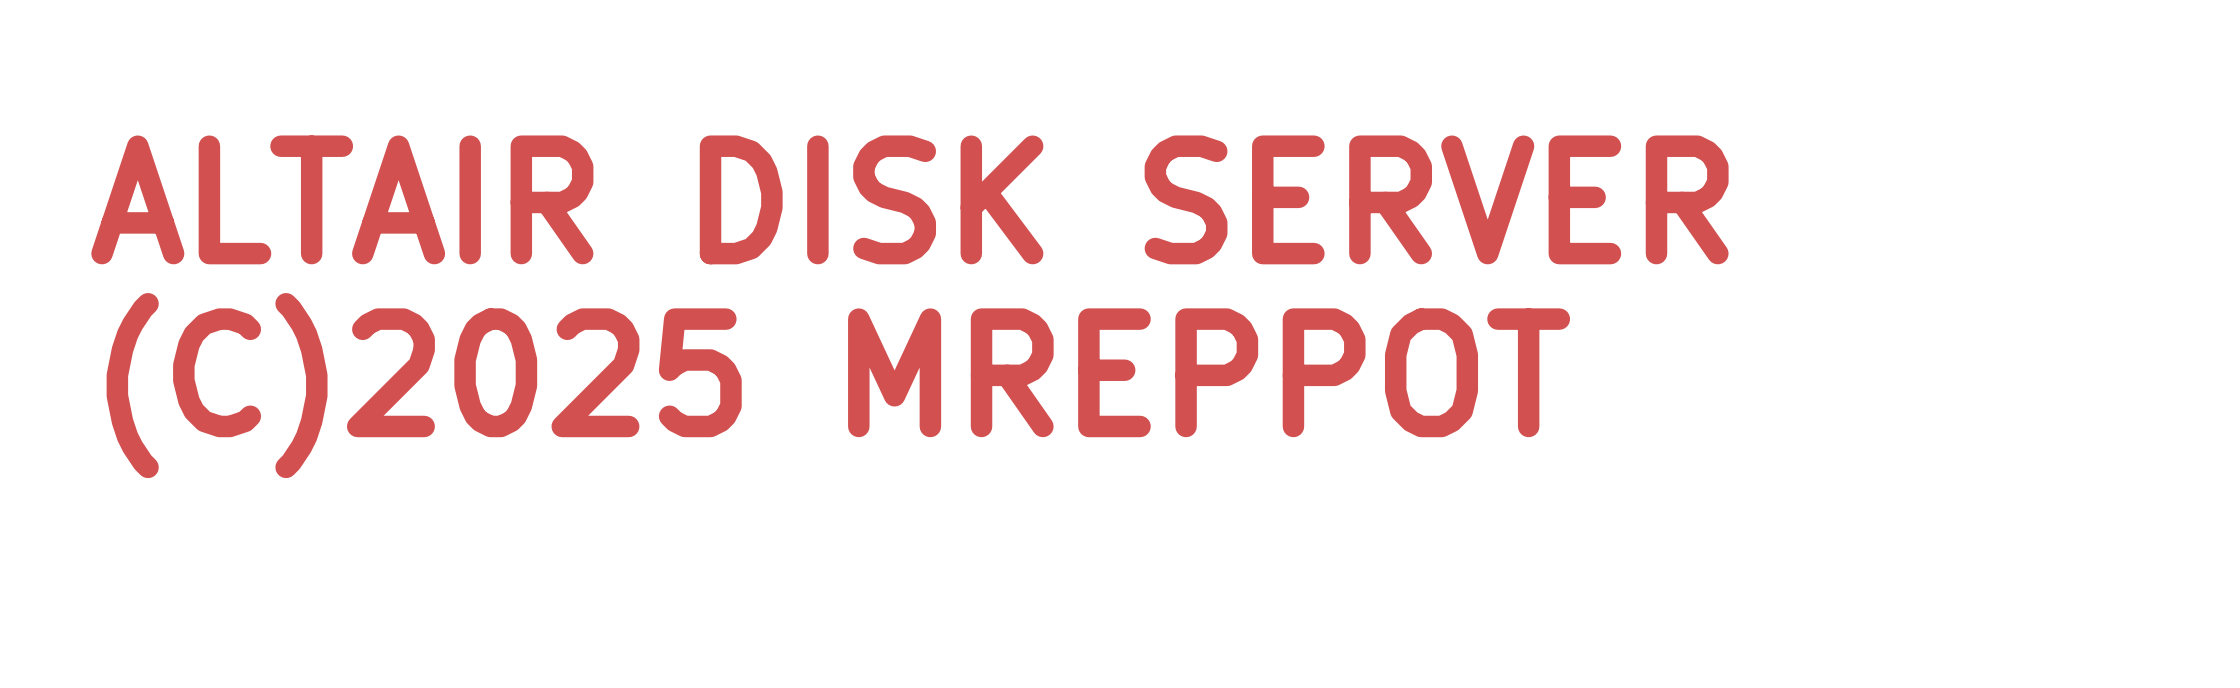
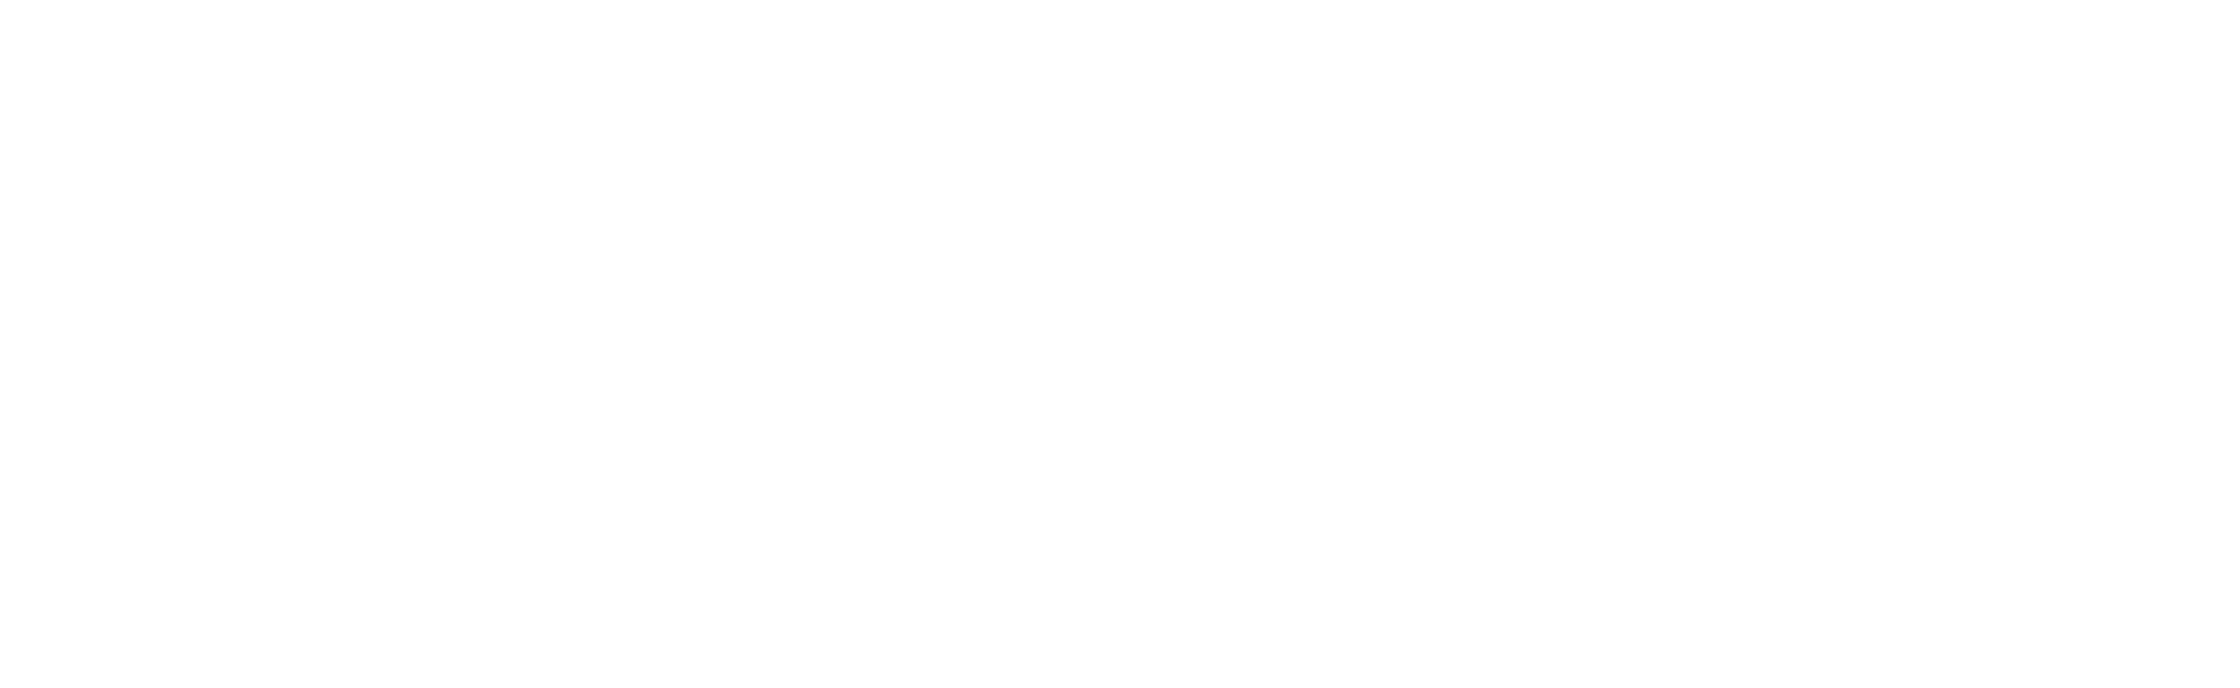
text: ALTAIR DISK SERVER (909, 199) -> none
text: (C)2025 MREPPOT (838, 385) -> none

